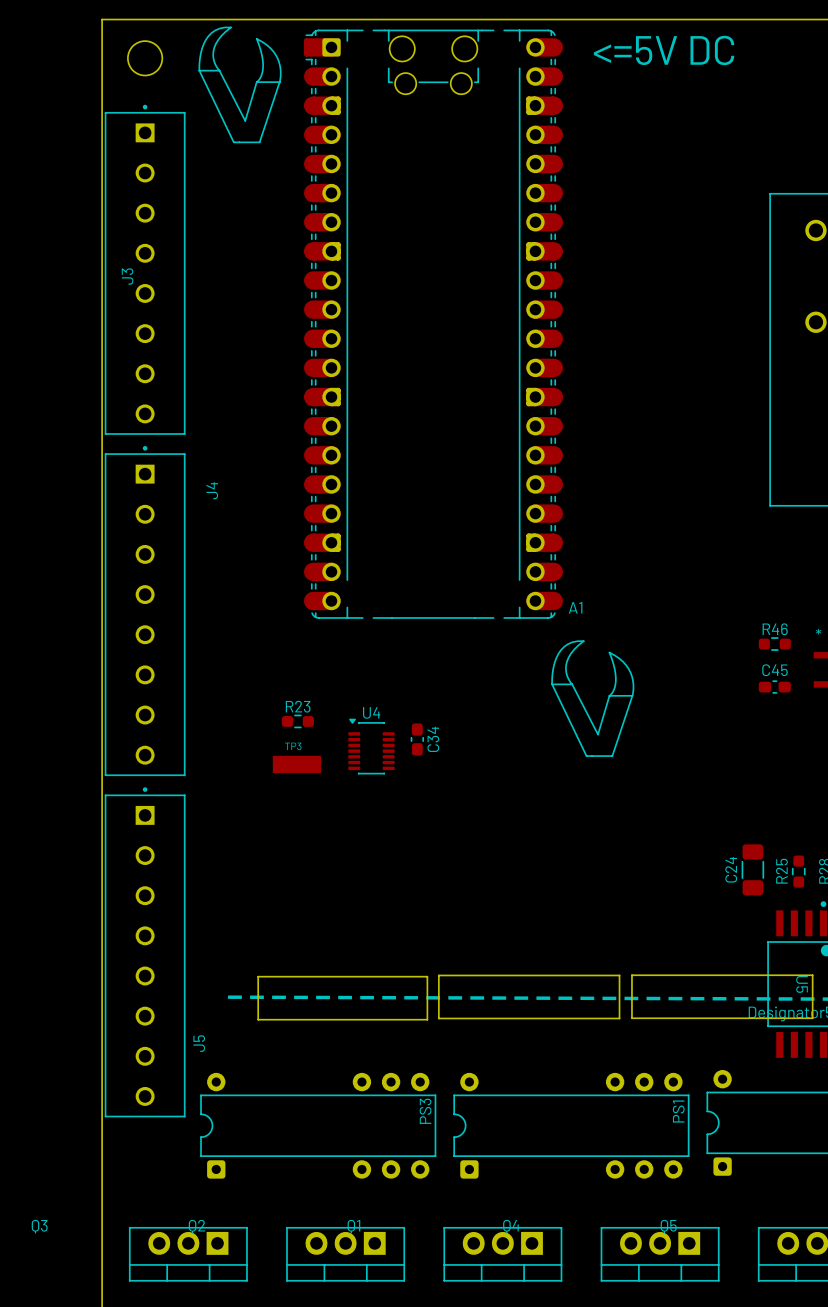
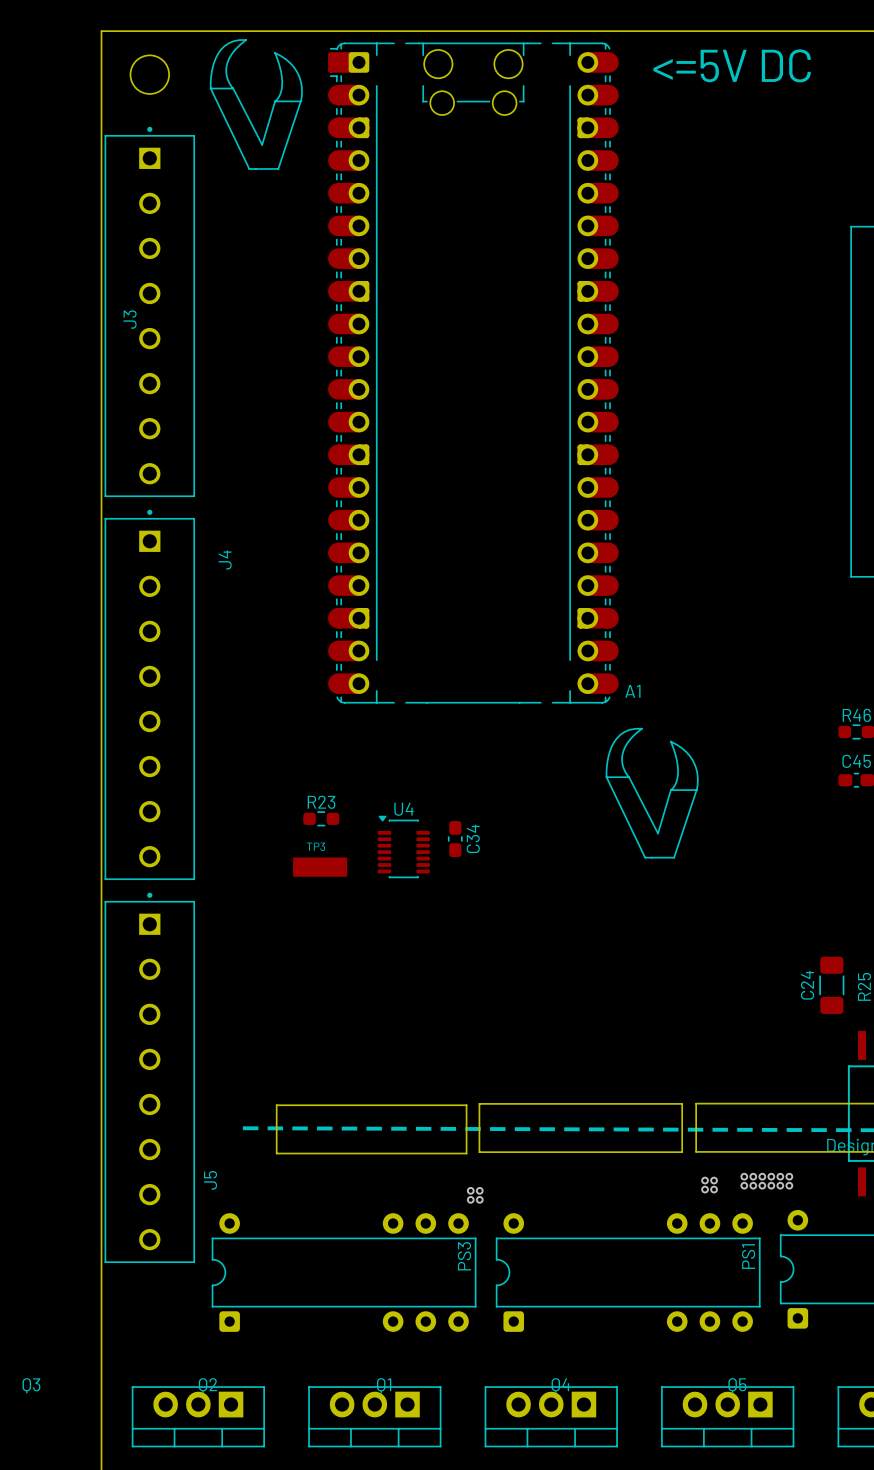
via: none -> (744, 1176)
via: none -> (753, 1176)
via: none -> (762, 1176)
via: none -> (771, 1176)
via: none -> (780, 1176)
via: none -> (789, 1176)
via: none -> (705, 1180)
via: none -> (714, 1180)
via: none -> (744, 1185)
via: none -> (753, 1185)
via: none -> (762, 1185)
via: none -> (771, 1185)
via: none -> (780, 1185)
via: none -> (789, 1185)
via: none -> (705, 1189)
via: none -> (714, 1189)
via: none -> (470, 1190)
via: none -> (479, 1190)
via: none -> (470, 1199)
via: none -> (479, 1199)

